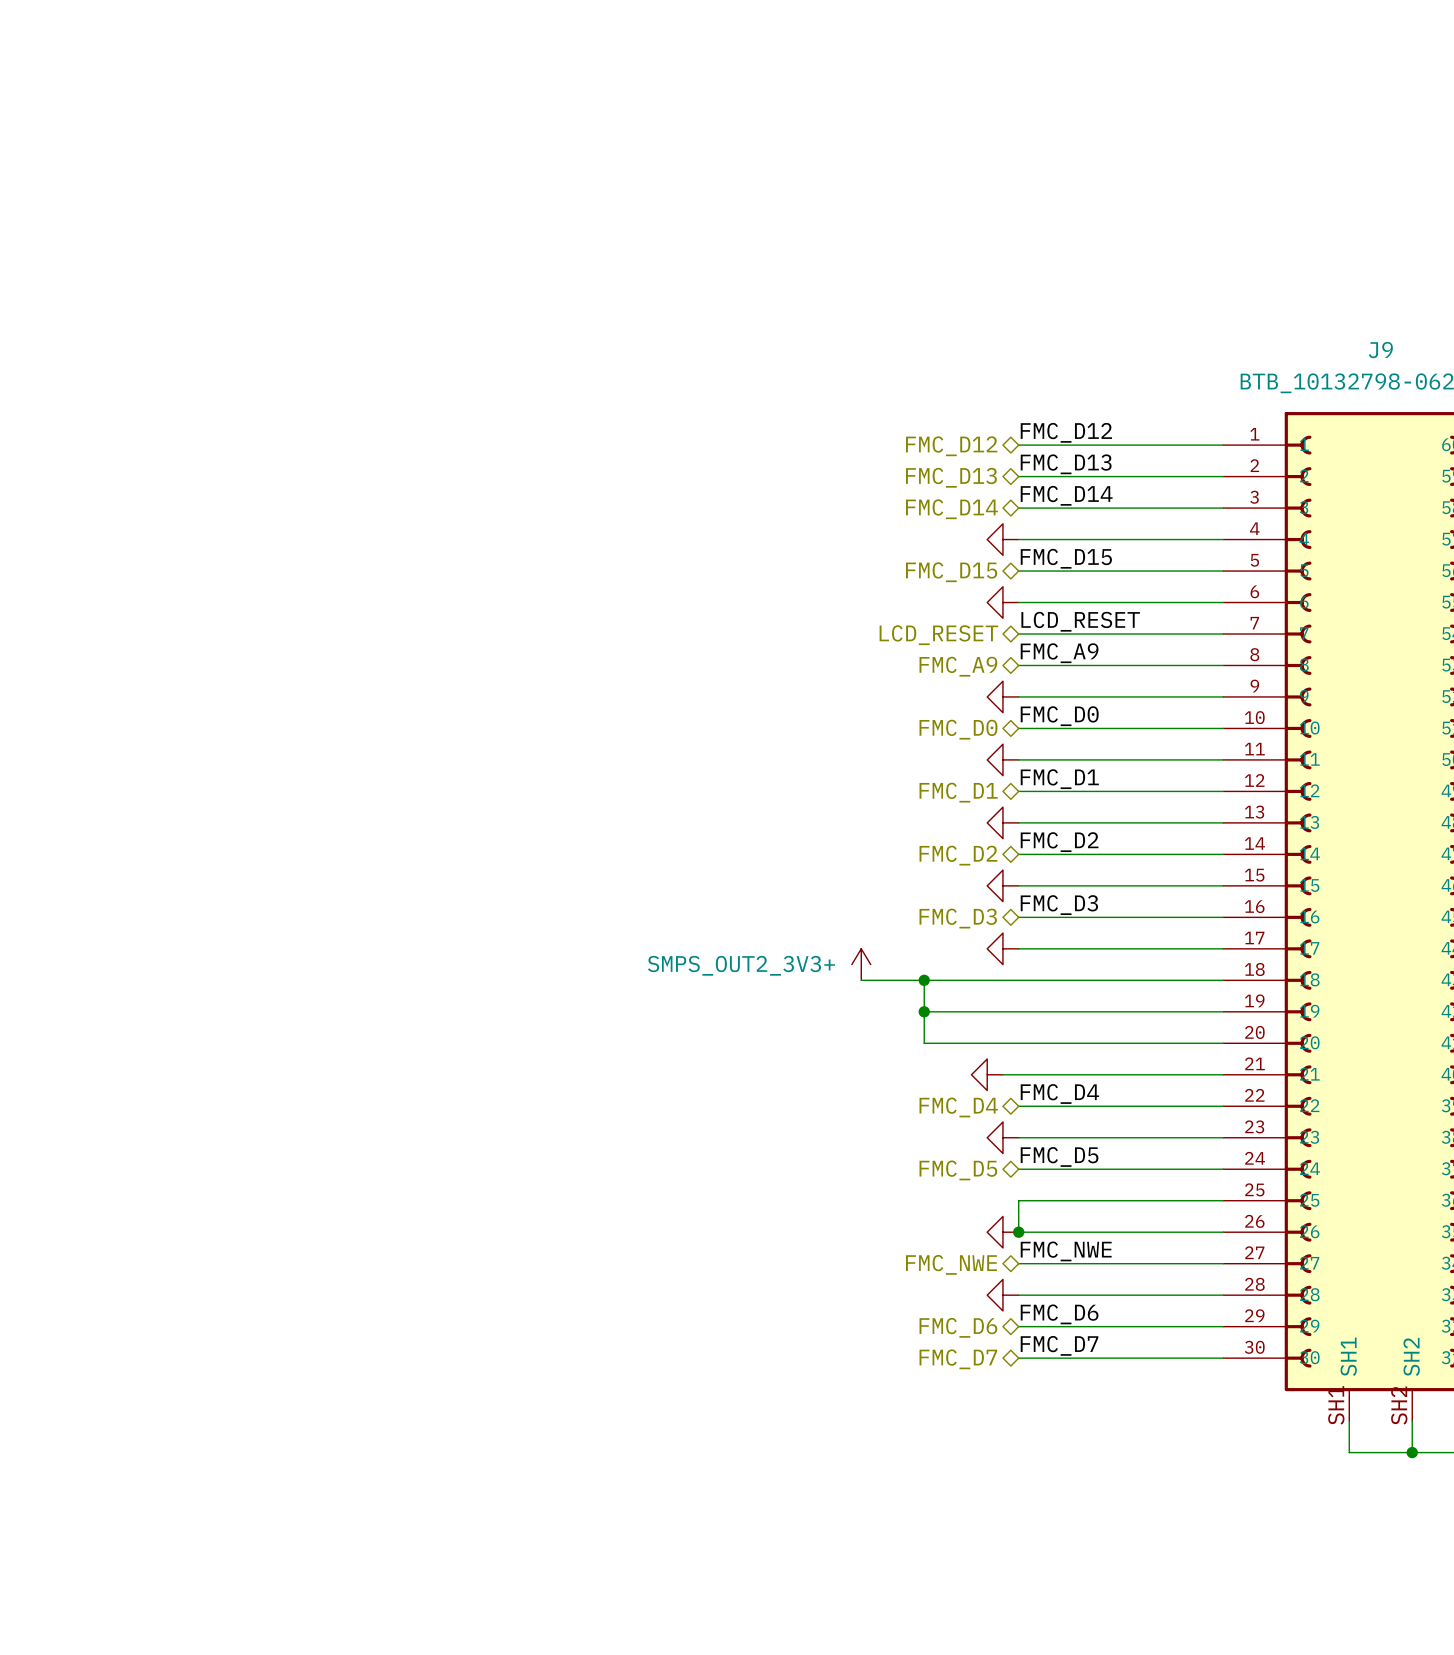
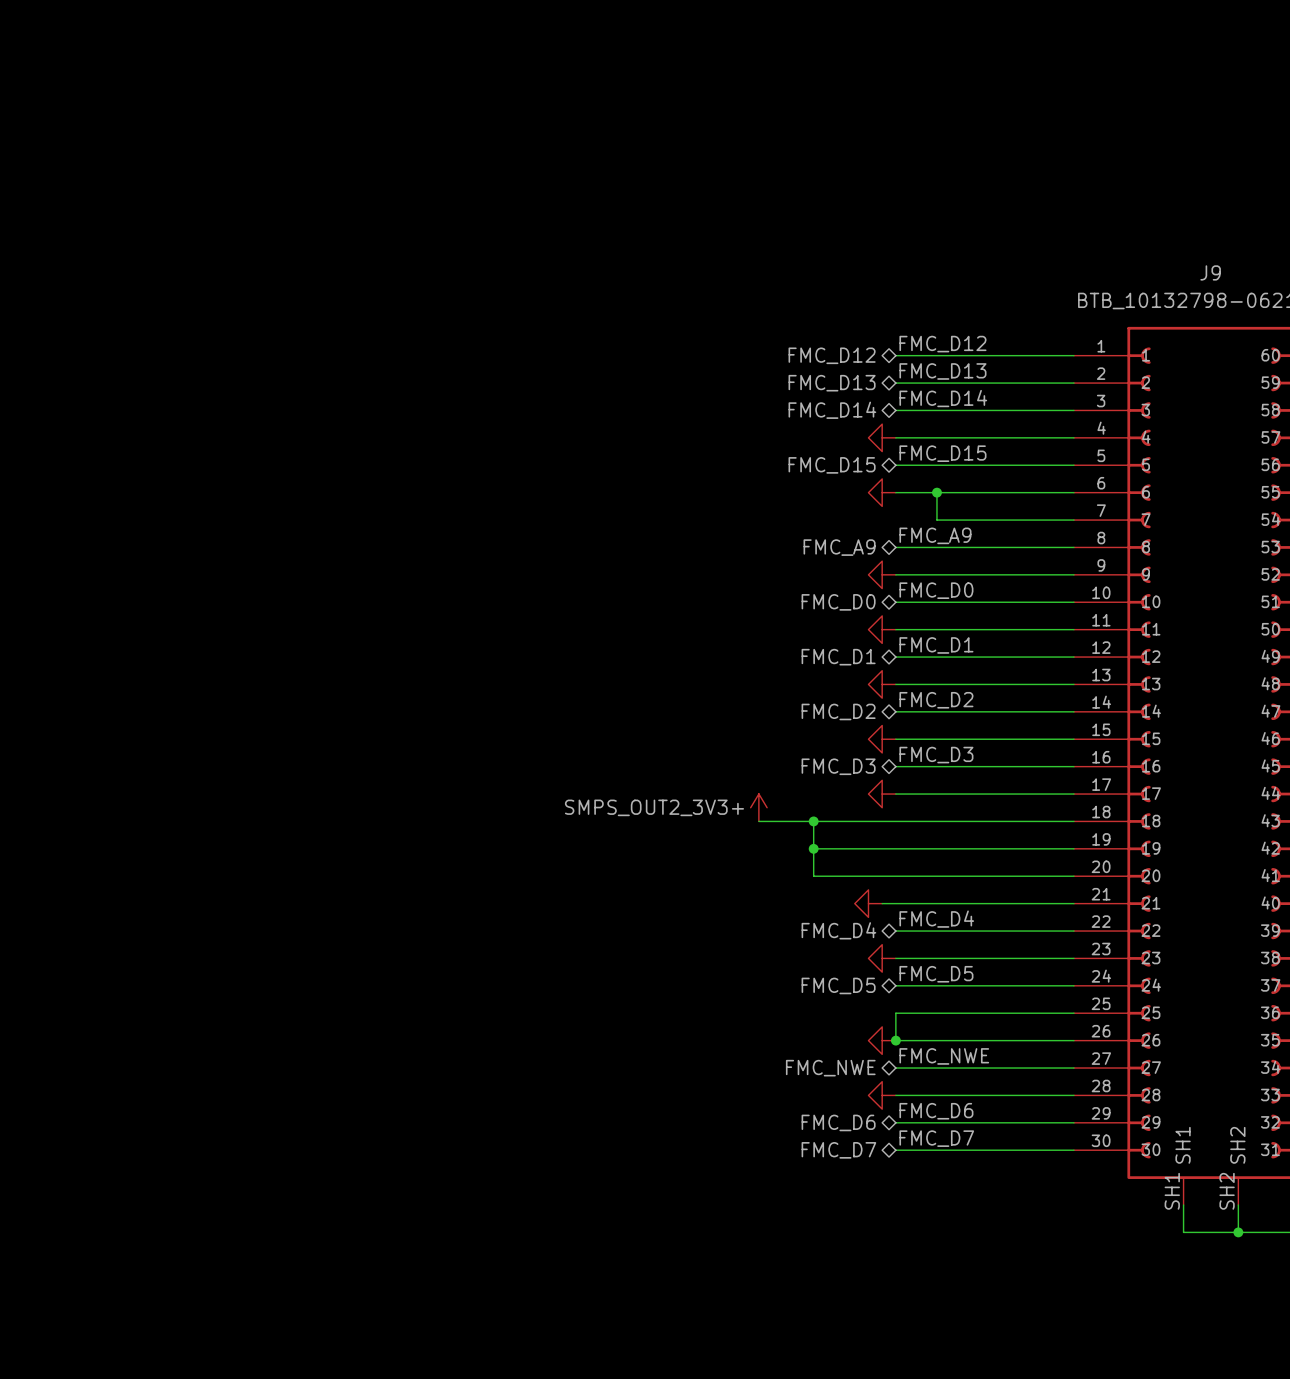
junction: none -> (936, 492)
label: LCD_RESET (1080, 621) -> none
wire: (1018, 634) (1065, 634) -> (936, 492) (936, 520)
hierarchical label: LCD_RESET (938, 635) -> none

